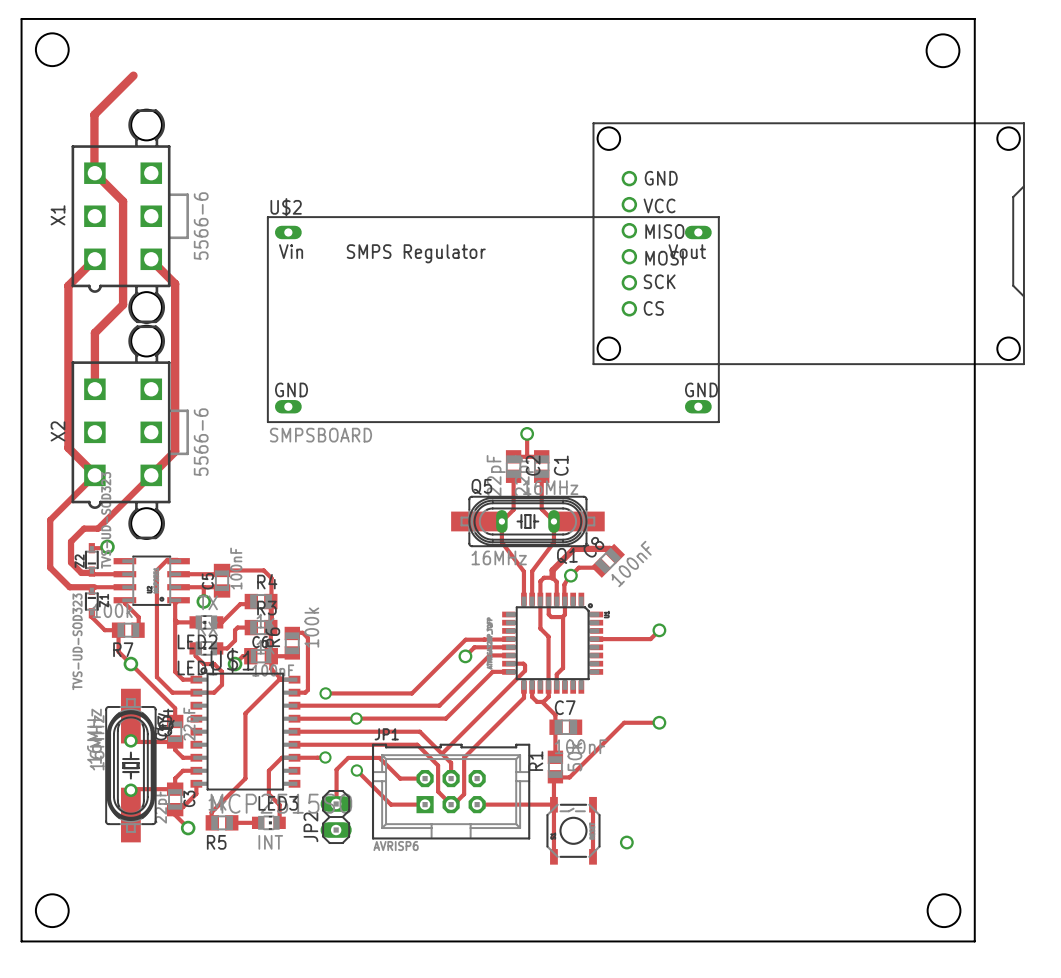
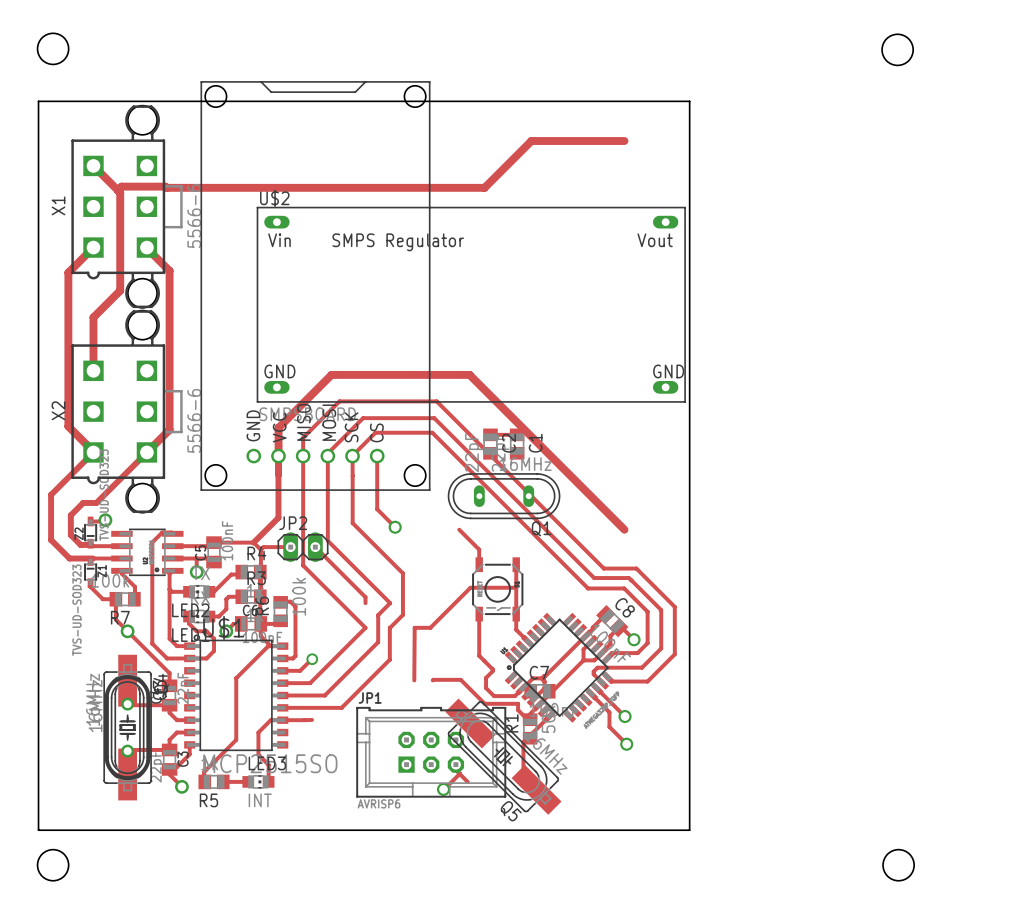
board edge: (21, 18) (974, 18) (974, 941) (21, 941) (21, 18) -> (38, 101) (38, 830) (689, 830) (689, 101) (38, 101)
track: (133, 75) (94, 114) (94, 172) -> none
track: none -> (624, 141) (531, 141) (484, 187) (121, 186) (117, 190)
part: (808, 243) -> none
part: none -> (315, 285)
track: (527, 433) (527, 456) -> none
via: (527, 433) -> none
track: (513, 476) (513, 509) (501, 521) -> none
track: (541, 476) (541, 509) (553, 521) -> none
track: none -> (377, 456) (377, 509) (395, 527)
track: (501, 521) (501, 542) (523, 571) (523, 599) -> none
Q5 rotation: 0° (527, 521) -> 135° counterclockwise (503, 756)
Q5 position: (527, 521) -> (503, 756)
track: (553, 521) (553, 542) (532, 571) (532, 599) -> none
track: (614, 553) (609, 548) (574, 548) (552, 570) (552, 577) -> none
via: none -> (395, 527)
track: none -> (459, 529) (479, 549) (479, 564)
track: none -> (624, 529) (469, 374) (331, 374) (278, 427) (278, 517) (253, 542)
C8 rotation: 0° (607, 560) -> 90° clockwise (612, 621)
C8 position: (607, 560) -> (612, 621)
track: (601, 567) (578, 567) (569, 575) (564, 584) (564, 614) (562, 617) -> none
track: none -> (290, 547) (263, 547) (260, 549)
track: none -> (315, 547) (365, 597) (365, 603)
via: (570, 575) -> none
track: (552, 577) (544, 577) (540, 581) (540, 599) -> none
track: (552, 577) (556, 581) (556, 599) -> none
track: none -> (516, 564) (516, 629) (527, 641)
track: (540, 599) (540, 628) (548, 636) (548, 696) (543, 701) (537, 701) (532, 697) (532, 687) -> none
track: (548, 599) (548, 614) (551, 617) (562, 617) -> none
track: (562, 617) (563, 668) (556, 674) (556, 687) -> none
track: none -> (516, 587) (470, 587) (430, 627) (414, 627) (414, 680)
track: (659, 630) (650, 639) (596, 639) -> none
via: (659, 630) -> none
track: (508, 639) (465, 639) (411, 693) (325, 693) -> none
part rotation: 0° (552, 643) -> 135° counterclockwise (559, 667)
part position: (552, 643) -> (559, 667)
track: none -> (479, 614) (479, 655) (492, 669) (486, 677) (486, 688) (494, 696) (514, 696) (521, 689)
track: none -> (605, 614) (543, 676) (543, 680)
track: (508, 647) (474, 647) (465, 656) -> none
track: (508, 655) (489, 655) (439, 705) (312, 705) -> (308, 662) (300, 670)
via: (465, 656) -> none
track: (508, 663) (523, 663) (525, 670) (442, 753) -> none
track: (508, 671) (492, 671) (446, 718) (356, 718) -> none
track: none -> (634, 639) (621, 627) (618, 627) (610, 636) (610, 644) (602, 652)
via: none -> (634, 639)
track: none -> (591, 641) (583, 649) (583, 660)
track: none -> (602, 652) (594, 660) (583, 660)
track: (524, 687) (524, 697) (464, 757) (464, 794) (453, 804) (451, 804) (438, 791) (438, 765) (417, 744) (356, 744) -> (608, 657) (612, 653) (637, 653) (647, 643) (647, 611) (624, 588) (588, 588) (432, 432) (375, 432) (352, 455) (352, 523) (402, 573) (402, 614) (389, 628) (389, 659) (341, 707)
track: none -> (583, 660) (538, 705)
track: (542, 701) (555, 715) (555, 757) -> none
track: none -> (432, 680) (460, 679) (484, 703) (518, 703) (518, 710) (523, 715) (528, 715) (538, 705)
track: (323, 718) (356, 718) -> (310, 683) (365, 627) (303, 565) (303, 437) (339, 401) (436, 401) (603, 568) (636, 568) (674, 606) (674, 654) (647, 681) (611, 681) (608, 678)
via: (356, 718) -> none
track: (659, 722) (624, 722) (569, 777) (553, 778) (553, 856) -> none
via: (659, 722) -> none
track: none -> (521, 689) (532, 678) (541, 678) (544, 681) (544, 688) (532, 700)
track: none -> (597, 689) (624, 716)
track: none -> (591, 694) (609, 712) (609, 726) (626, 744)
track: (338, 731) (419, 731) (451, 762) (451, 778) -> (324, 695) (378, 642) (378, 615) (390, 603) (327, 540) (327, 453) (363, 418) (434, 418) (594, 578) (628, 578) (661, 610) (661, 648) (642, 667) (597, 667) (593, 674) (602, 683)
track: none -> (549, 716) (523, 742) (524, 777)
via: none -> (625, 716)
via: (325, 757) -> none
track: (356, 770) (390, 804) (425, 804) -> none
via: (356, 770) -> none
track: (425, 778) (400, 778) (379, 757) (348, 757) (336, 769) (336, 803) -> none
via: none -> (626, 744)
track: (477, 804) (553, 804) -> none
track: (593, 804) (593, 856) -> none
track: none -> (451, 765) (467, 782)
track: none -> (459, 773) (443, 789)
JP2 rotation: 0° (336, 817) -> 90° clockwise (303, 547)
JP2 position: (336, 817) -> (303, 547)
via: none -> (443, 789)
part rotation: 0° (573, 830) -> 180° (497, 589)
part position: (573, 830) -> (497, 589)
via: (626, 842) -> none

